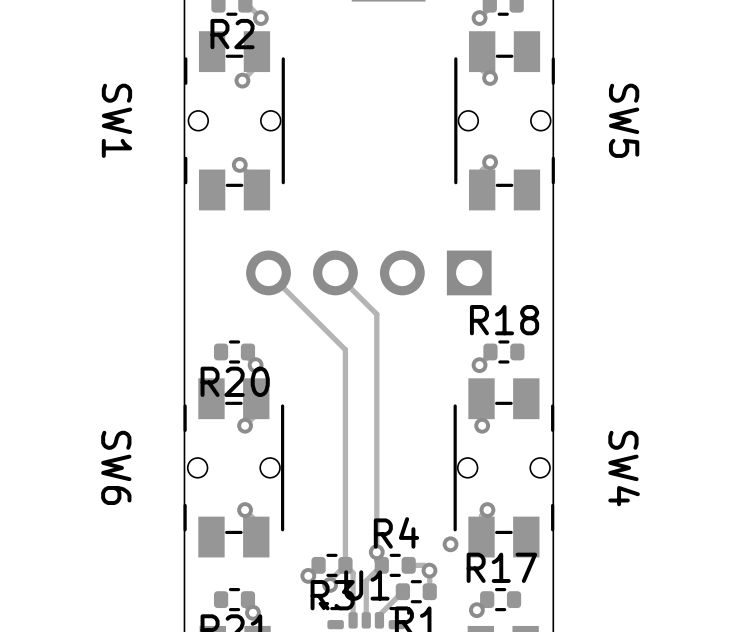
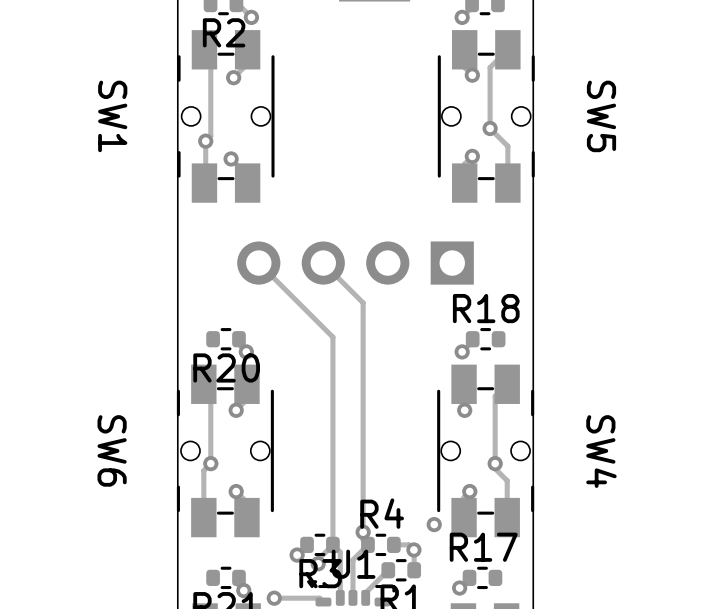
track: none -> (204, 49) (210, 56) (210, 136) (205, 141) (204, 183)
track: none -> (507, 49) (490, 67) (490, 128) (507, 146) (507, 183)
via: none -> (490, 128)
via: none -> (205, 141)
track: none -> (203, 384) (210, 391) (210, 463) (203, 470) (203, 517)
track: none -> (507, 384) (495, 396) (495, 468) (507, 480) (507, 517)
via: none -> (210, 463)
via: none -> (495, 463)
track: none -> (274, 598) (319, 598) (323, 602)
via: none -> (274, 598)

